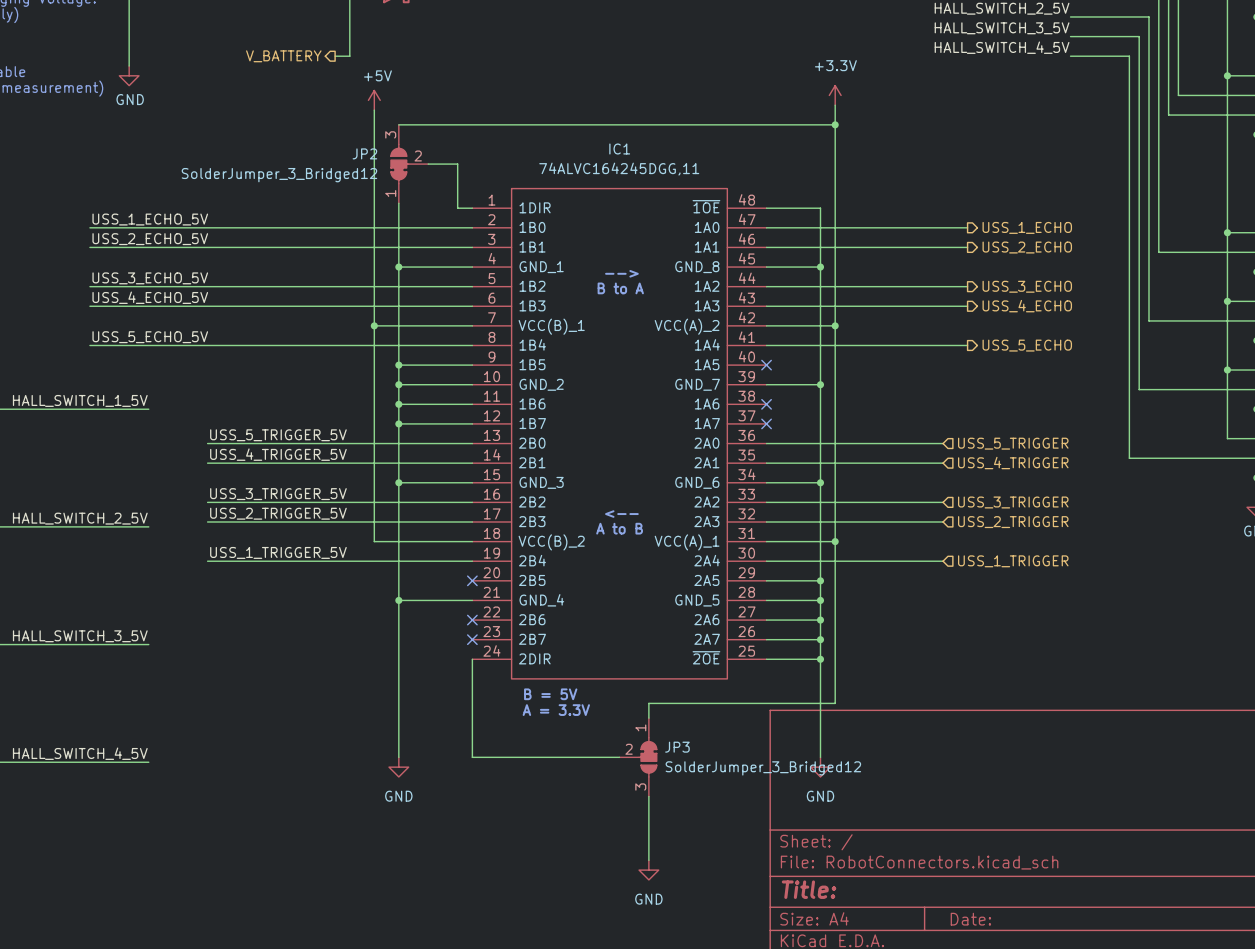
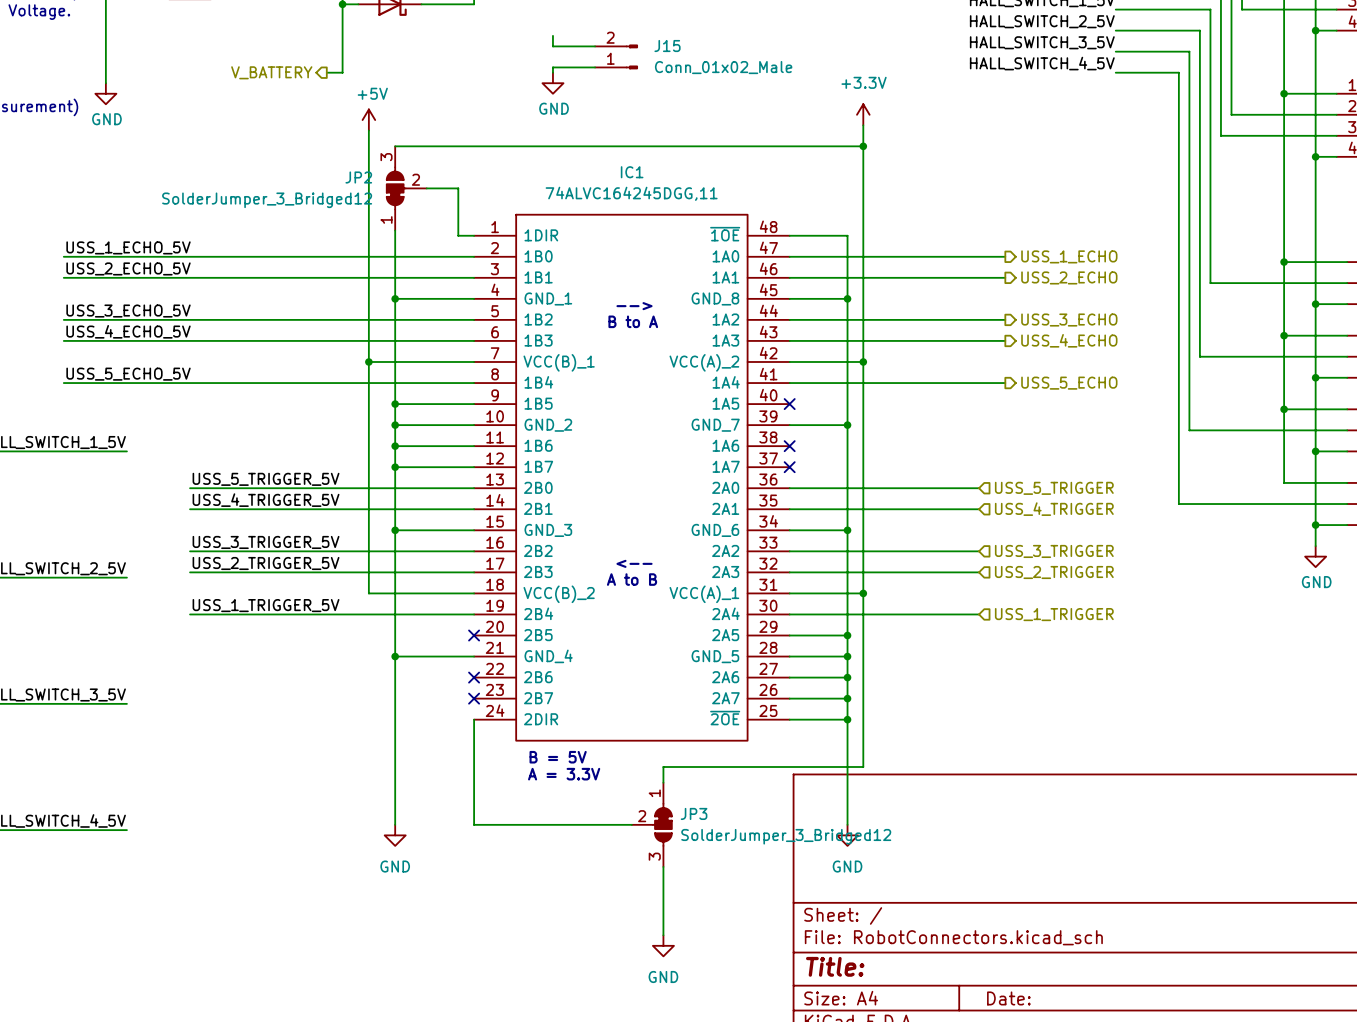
wire: none -> (552, 35) (552, 46) (595, 46)
J15: none -> Conn_01x02_Male (616, 56)
wire: none -> (595, 67) (552, 67) (552, 72)
power symbol: none -> GND (552, 83)

